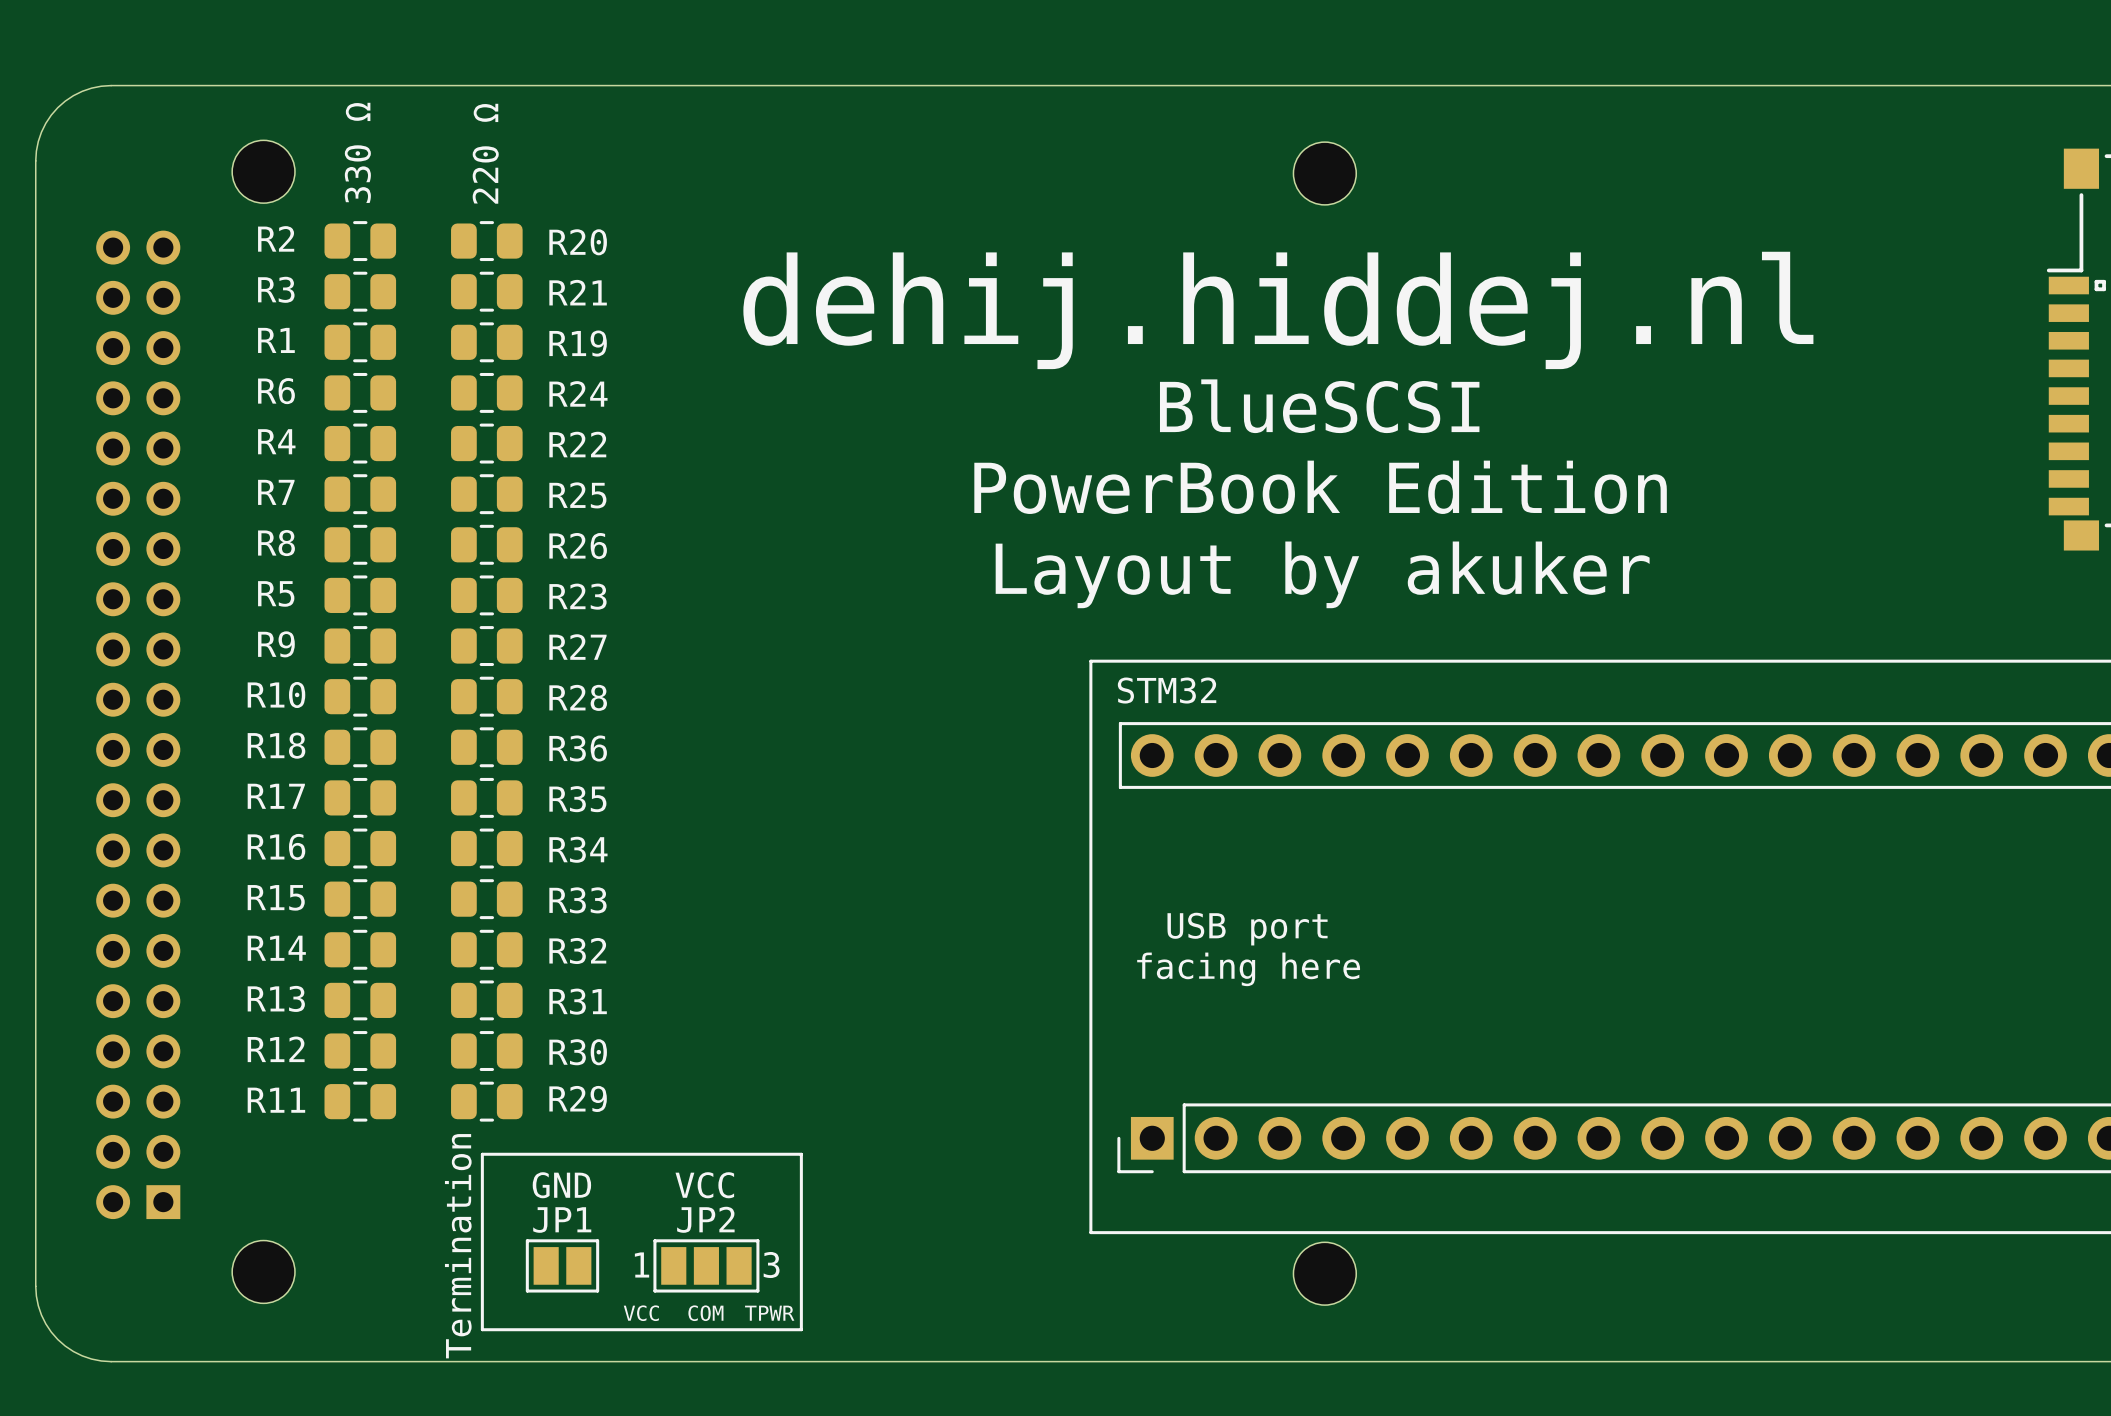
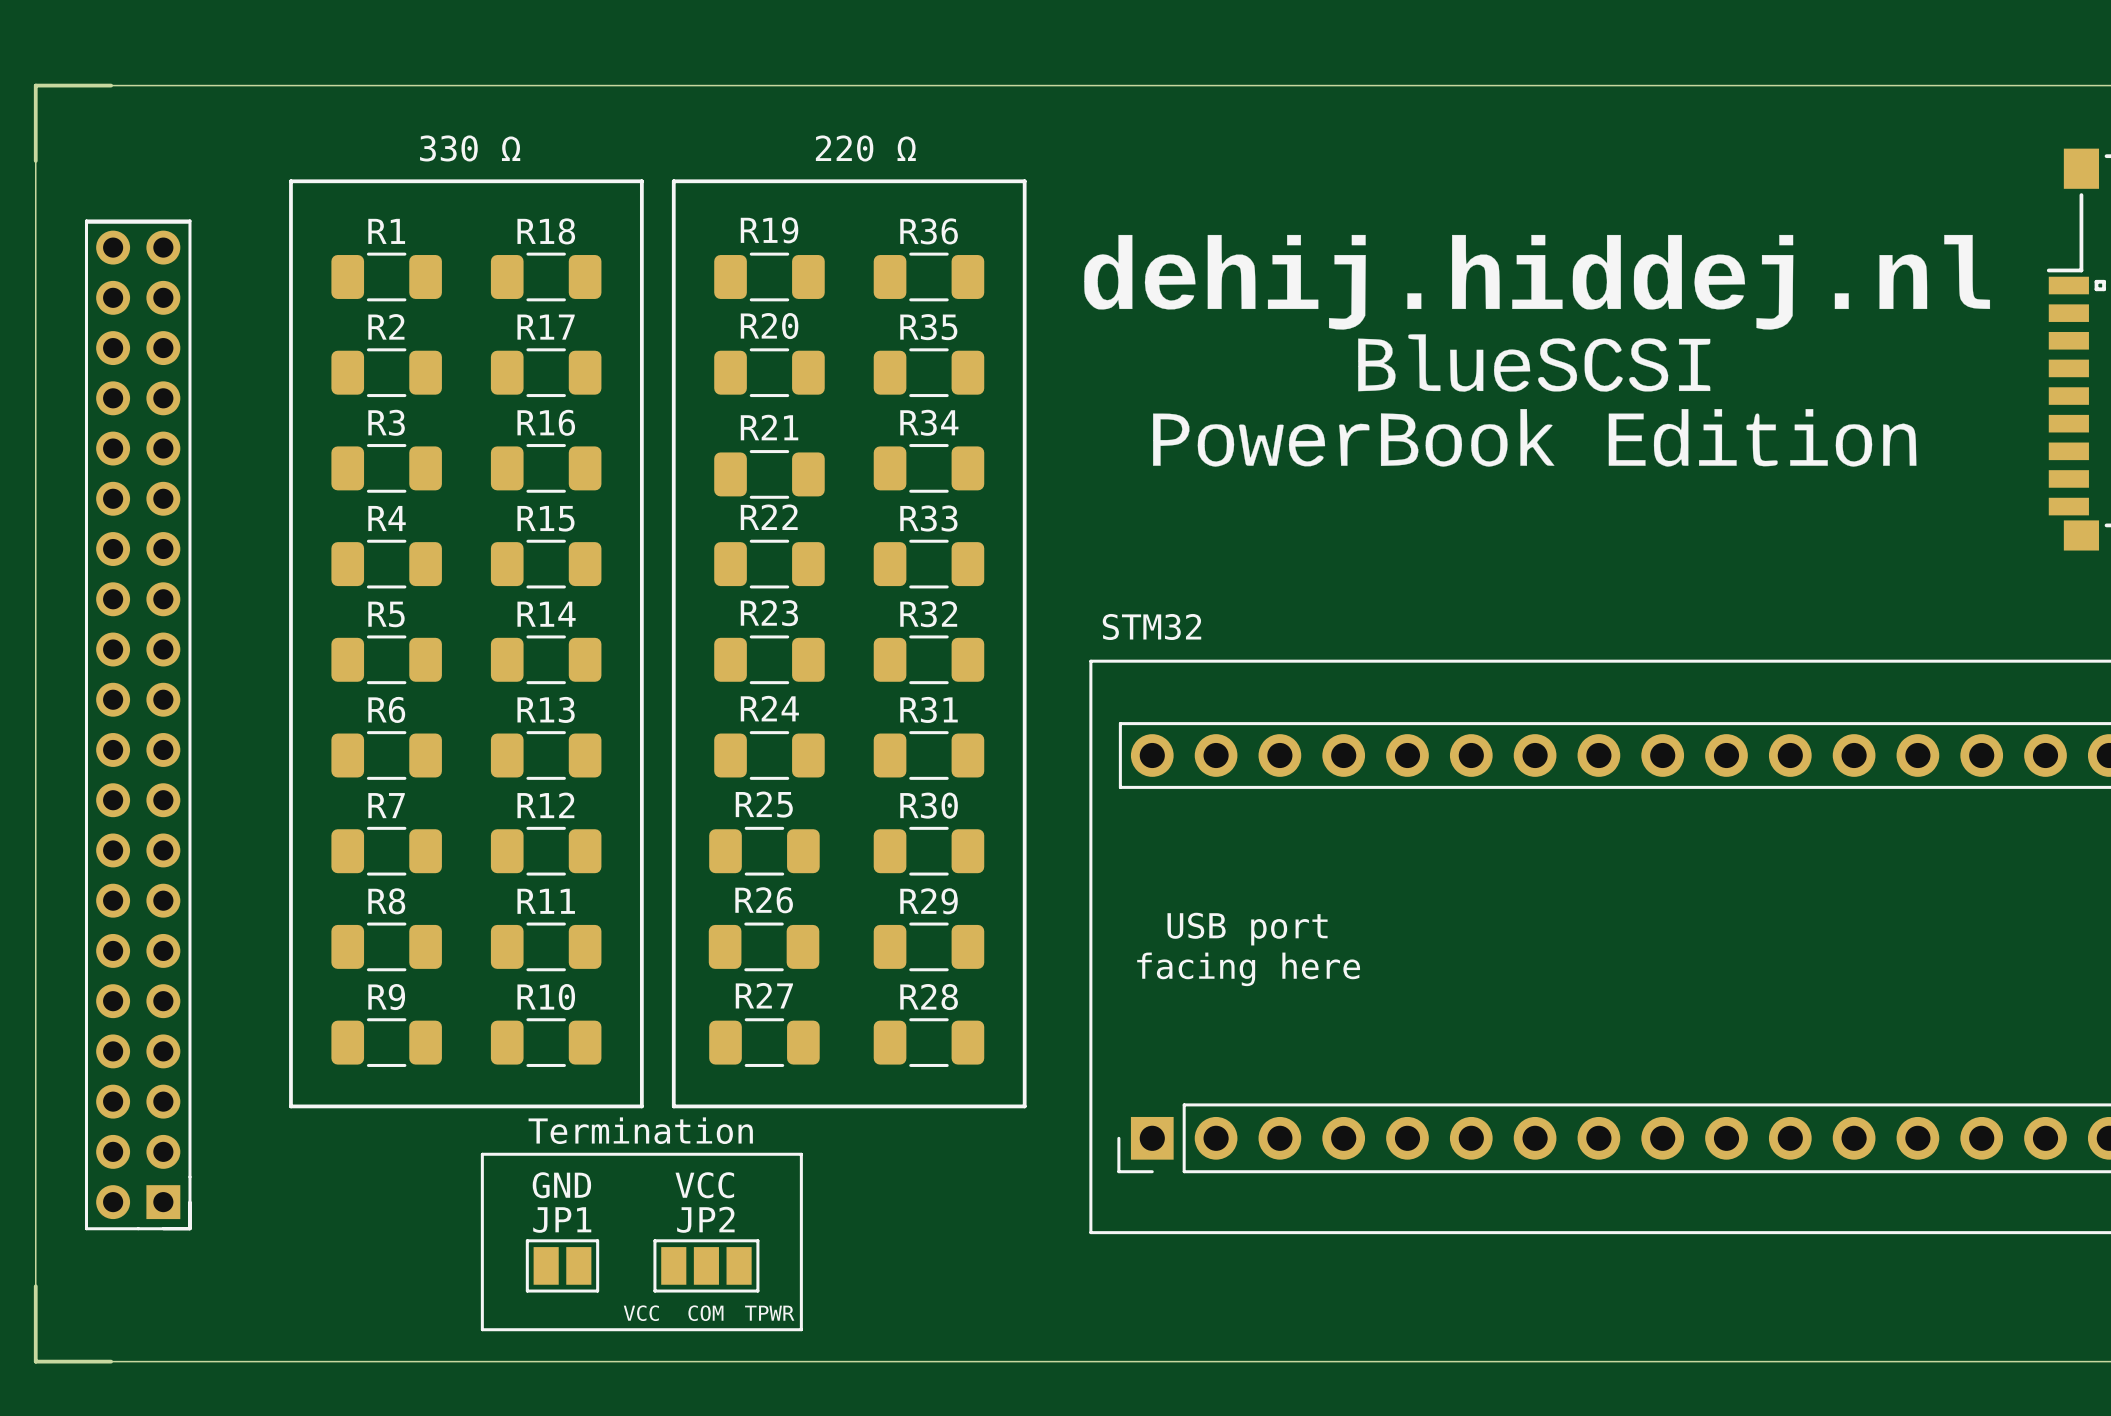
board edge: (111, 85) (82, 91) (57, 107) (41, 132) (35, 160) -> (111, 85) (35, 85) (35, 160)
text rotation: 0° (357, 152) -> 90° clockwise (470, 148)
text rotation: 0° (485, 153) -> 90° clockwise (865, 148)
text position: 220 Ω (485, 153) -> 220 Ω (865, 148)
part: (263, 171) -> none
part: (1324, 173) -> none
line: none -> (290, 181) (290, 1106) (641, 1106) (641, 181) (290, 181)
line: none -> (673, 181) (673, 1106) (1024, 1106) (1024, 181) (673, 181)
R2 footprint: [324, 221, 397, 262] -> [331, 348, 442, 398]
R20 footprint: [451, 221, 523, 262] -> [714, 348, 825, 398]
part footprint: [96, 230, 181, 1220] -> [84, 219, 192, 1231]
drawing: none -> [1084, 234, 1991, 467]
R2 name position: R2 (276, 238) -> R2 (386, 326)
R20 name position: R20 (578, 242) -> R20 (769, 326)
R3 footprint: [324, 271, 397, 312] -> [331, 444, 442, 493]
R21 footprint: [451, 271, 523, 312] -> [714, 450, 825, 499]
R3 name position: R3 (276, 289) -> R3 (386, 422)
R21 name position: R21 (578, 292) -> R21 (769, 427)
text: dehij.hiddej.nl (1278, 310) -> none
R1 footprint: [324, 322, 397, 363] -> [331, 252, 442, 302]
R19 footprint: [451, 322, 523, 363] -> [714, 252, 825, 302]
R1 name position: R1 (276, 340) -> R1 (386, 231)
R19 name position: R19 (578, 343) -> R19 (769, 230)
R6 footprint: [324, 372, 397, 413] -> [331, 731, 442, 780]
R24 footprint: [451, 372, 523, 413] -> [714, 731, 825, 780]
R6 name position: R6 (276, 391) -> R6 (386, 709)
R24 name position: R24 (578, 393) -> R24 (769, 708)
text: BlueSCSI (1319, 406) -> none
R4 footprint: [324, 423, 397, 464] -> [331, 539, 442, 589]
R22 footprint: [451, 423, 523, 464] -> [714, 539, 825, 589]
R4 name position: R4 (276, 441) -> R4 (387, 518)
R22 name position: R22 (577, 444) -> R22 (769, 517)
R7 footprint: [324, 474, 397, 515] -> [331, 826, 442, 876]
R25 footprint: [451, 474, 523, 515] -> [709, 826, 820, 876]
text: PowerBook Edition (1320, 487) -> none
R7 name position: R7 (276, 492) -> R7 (386, 805)
R25 name position: R25 (577, 495) -> R25 (764, 804)
R8 footprint: [324, 524, 397, 565] -> [331, 922, 442, 972]
R26 footprint: [451, 524, 523, 565] -> [708, 922, 820, 972]
R8 name position: R8 (276, 543) -> R8 (386, 901)
R26 name position: R26 (578, 546) -> R26 (764, 900)
text: Layout by akuker (1322, 574) -> none
R5 footprint: [324, 575, 397, 616] -> [331, 635, 442, 685]
R23 footprint: [451, 575, 523, 616] -> [714, 635, 825, 685]
R5 name position: R5 (276, 593) -> R5 (386, 614)
R23 name position: R23 (577, 596) -> R23 (769, 613)
R9 footprint: [324, 626, 397, 667] -> [331, 1018, 442, 1067]
R27 footprint: [451, 626, 523, 667] -> [709, 1018, 820, 1067]
R9 name position: R9 (276, 644) -> R9 (386, 997)
R27 name position: R27 (577, 647) -> R27 (764, 995)
R10 footprint: [324, 676, 397, 717] -> [490, 1018, 602, 1067]
R28 footprint: [451, 676, 523, 717] -> [873, 1018, 985, 1067]
text position: STM32 (1167, 690) -> STM32 (1151, 626)
R10 name position: R10 (276, 695) -> R10 (546, 997)
R28 name position: R28 (578, 697) -> R28 (929, 997)
R18 footprint: [324, 727, 397, 768] -> [490, 252, 602, 302]
R36 footprint: [451, 727, 523, 768] -> [873, 252, 985, 302]
R18 name position: R18 (276, 745) -> R18 (546, 231)
R36 name position: R36 (578, 748) -> R36 (929, 231)
R17 footprint: [324, 777, 397, 818] -> [490, 348, 602, 398]
R35 footprint: [451, 777, 523, 818] -> [873, 348, 985, 398]
R17 name position: R17 (276, 796) -> R17 (546, 327)
R35 name position: R35 (577, 799) -> R35 (928, 327)
R16 footprint: [324, 828, 397, 869] -> [490, 444, 602, 493]
R34 footprint: [451, 828, 523, 869] -> [873, 444, 985, 493]
R16 name position: R16 (276, 846) -> R16 (546, 422)
R34 name position: R34 (578, 849) -> R34 (929, 422)
R15 footprint: [324, 879, 397, 920] -> [490, 539, 602, 589]
R33 footprint: [451, 879, 523, 920] -> [873, 539, 985, 589]
R15 name position: R15 (276, 897) -> R15 (545, 518)
R33 name position: R33 (577, 900) -> R33 (928, 518)
R14 footprint: [324, 929, 397, 970] -> [490, 635, 602, 685]
R32 footprint: [451, 929, 523, 970] -> [873, 635, 985, 685]
R14 name position: R14 (276, 948) -> R14 (546, 614)
R32 name position: R32 (577, 951) -> R32 (928, 614)
R13 footprint: [324, 980, 397, 1021] -> [490, 731, 602, 780]
R31 footprint: [451, 980, 523, 1021] -> [873, 731, 985, 780]
R13 name position: R13 (276, 998) -> R13 (546, 709)
R31 name position: R31 (578, 1001) -> R31 (929, 709)
R12 footprint: [324, 1031, 397, 1071] -> [490, 826, 602, 876]
R30 footprint: [451, 1031, 523, 1071] -> [873, 826, 985, 876]
R12 name position: R12 (276, 1049) -> R12 (545, 805)
R30 name position: R30 (578, 1052) -> R30 (929, 805)
R11 footprint: [324, 1081, 397, 1122] -> [490, 922, 602, 972]
R29 footprint: [451, 1081, 523, 1122] -> [873, 922, 985, 972]
R29 name position: R29 (578, 1098) -> R29 (929, 901)
R11 name position: R11 (276, 1100) -> R11 (546, 901)
text rotation: 0° (458, 1246) -> 90° clockwise (640, 1130)
JP2 text: 1 (642, 1264) -> none
JP2 text: 3 (771, 1265) -> none
part: (263, 1271) -> none
part: (1324, 1273) -> none
board edge: (35, 1286) (41, 1315) (57, 1339) (82, 1355) (111, 1361) -> (35, 1286) (35, 1361) (111, 1361)

